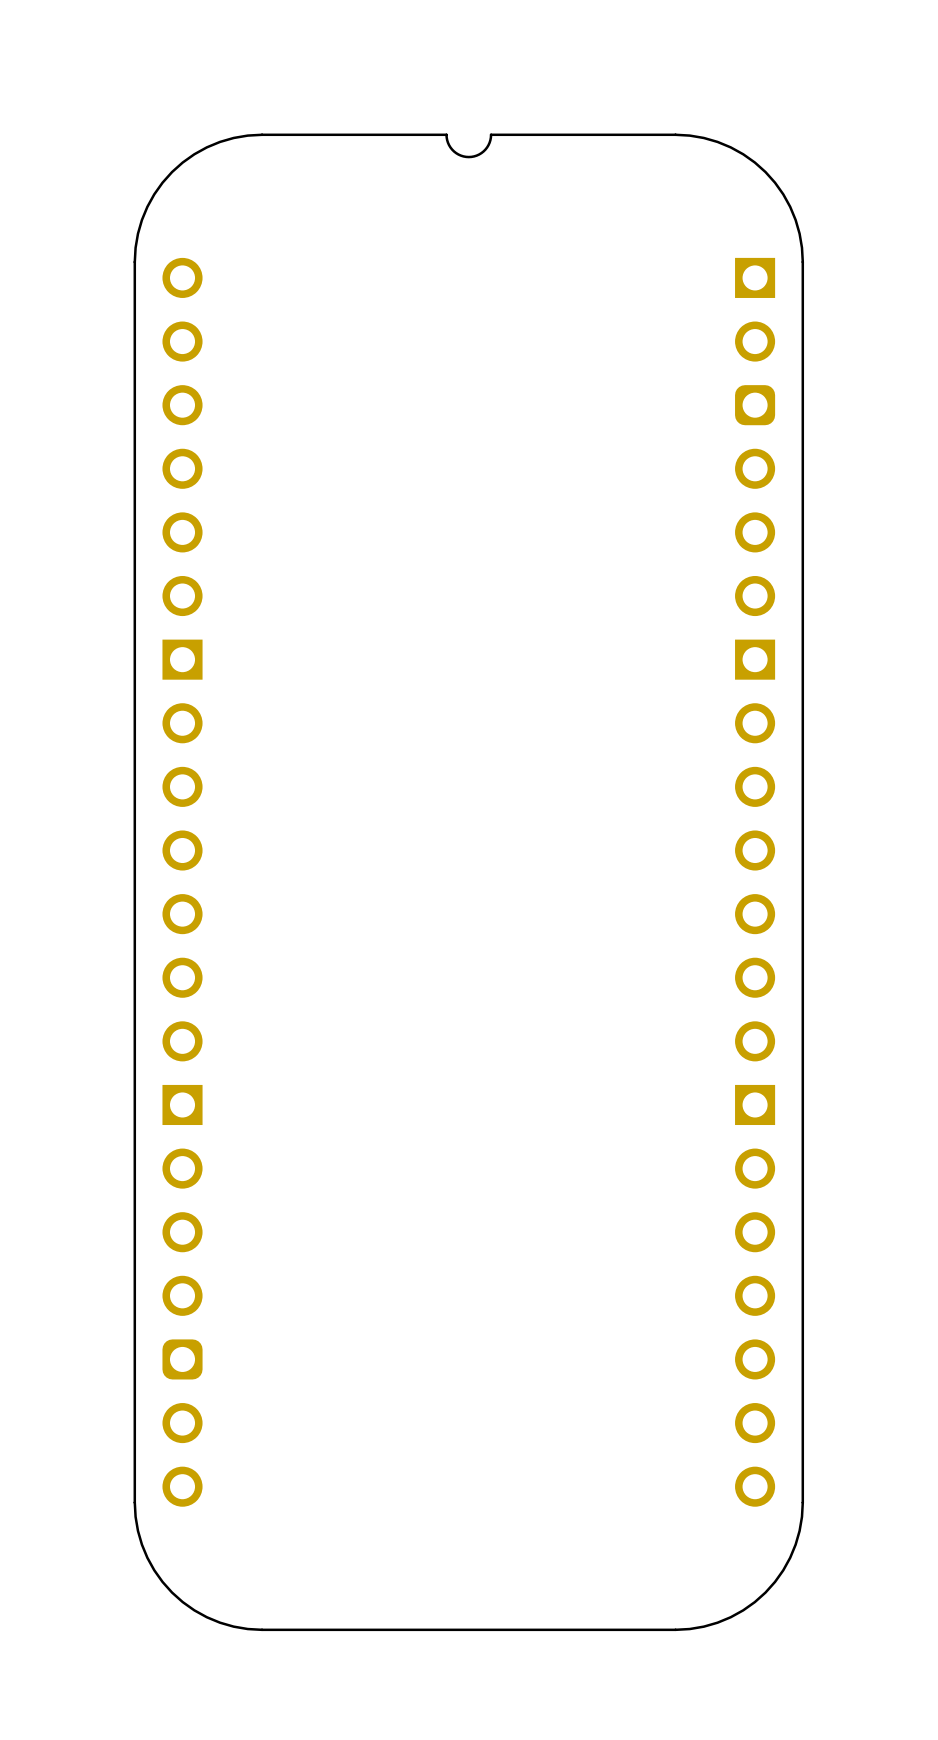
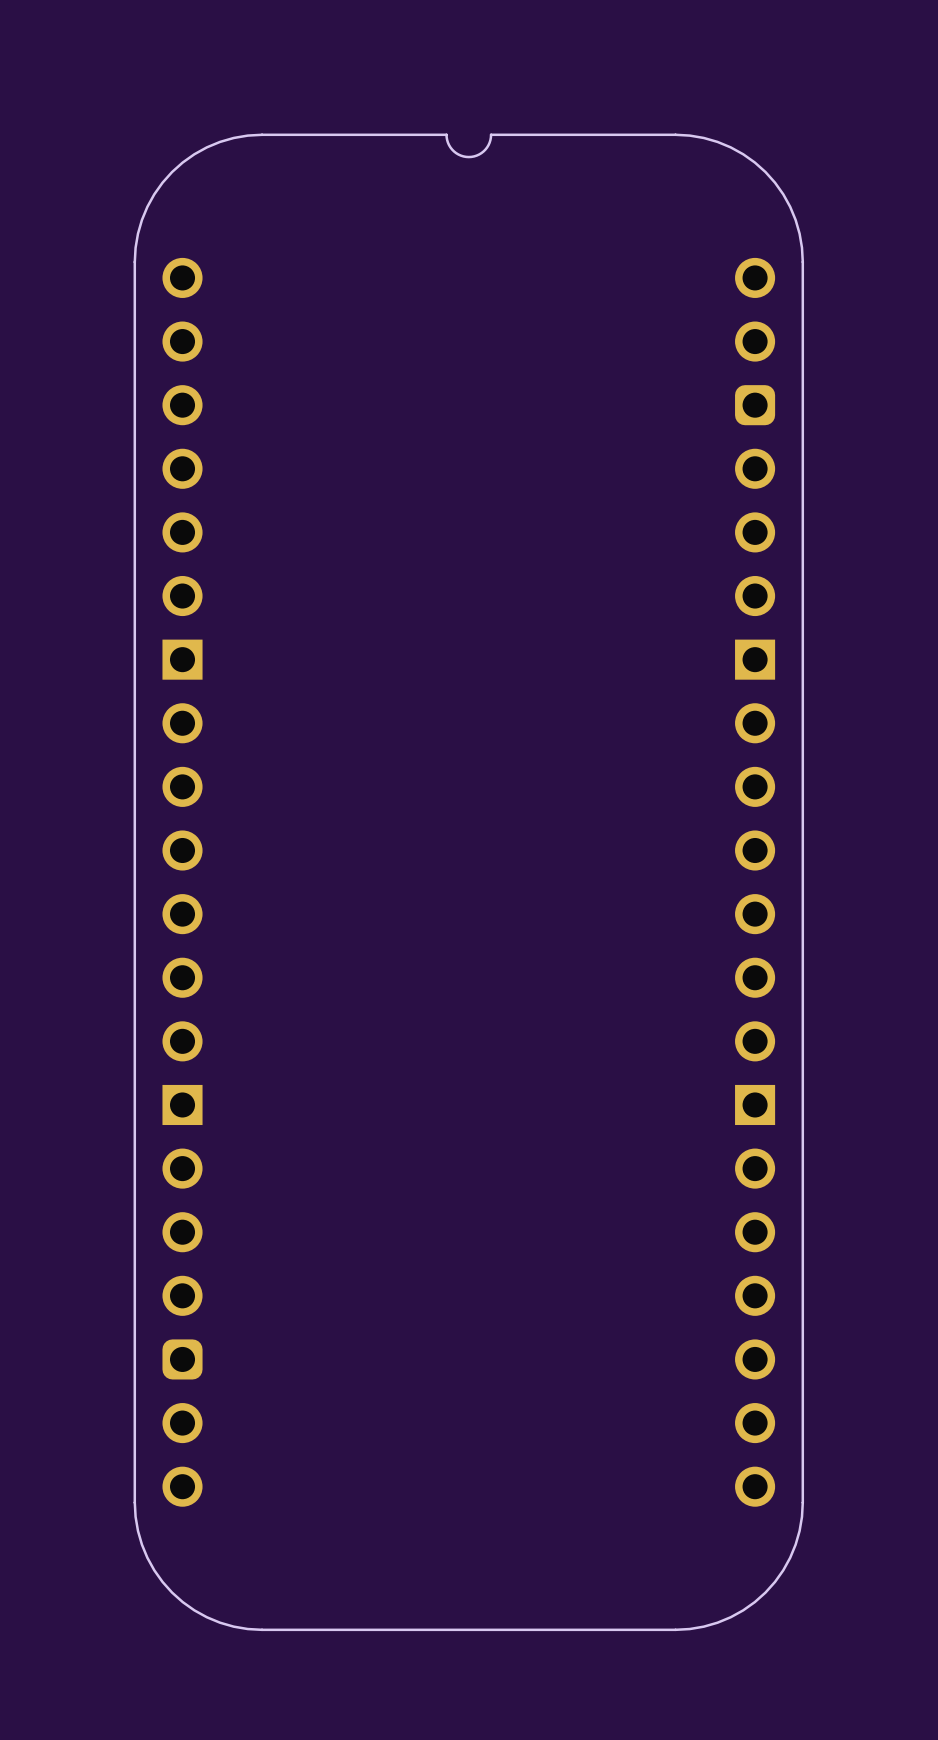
part footprint: [133, 133, 805, 1632] -> [133, 133, 805, 1632]

